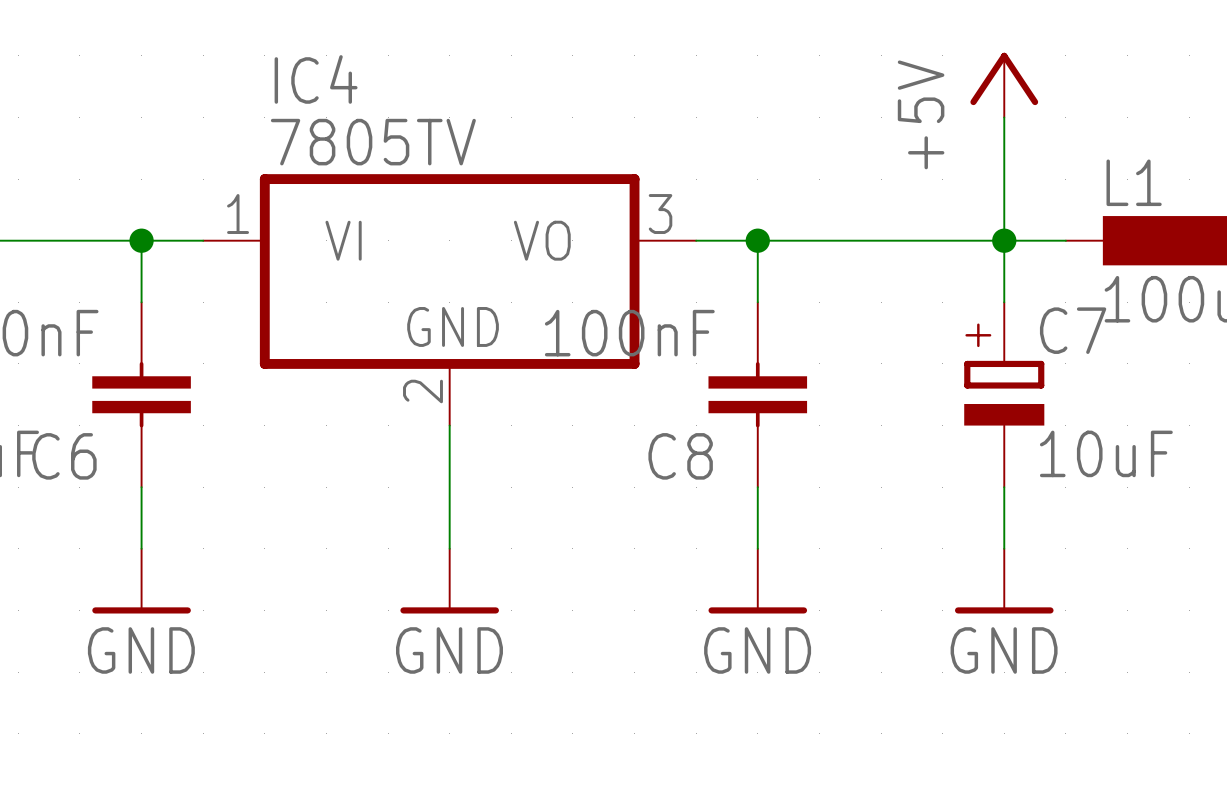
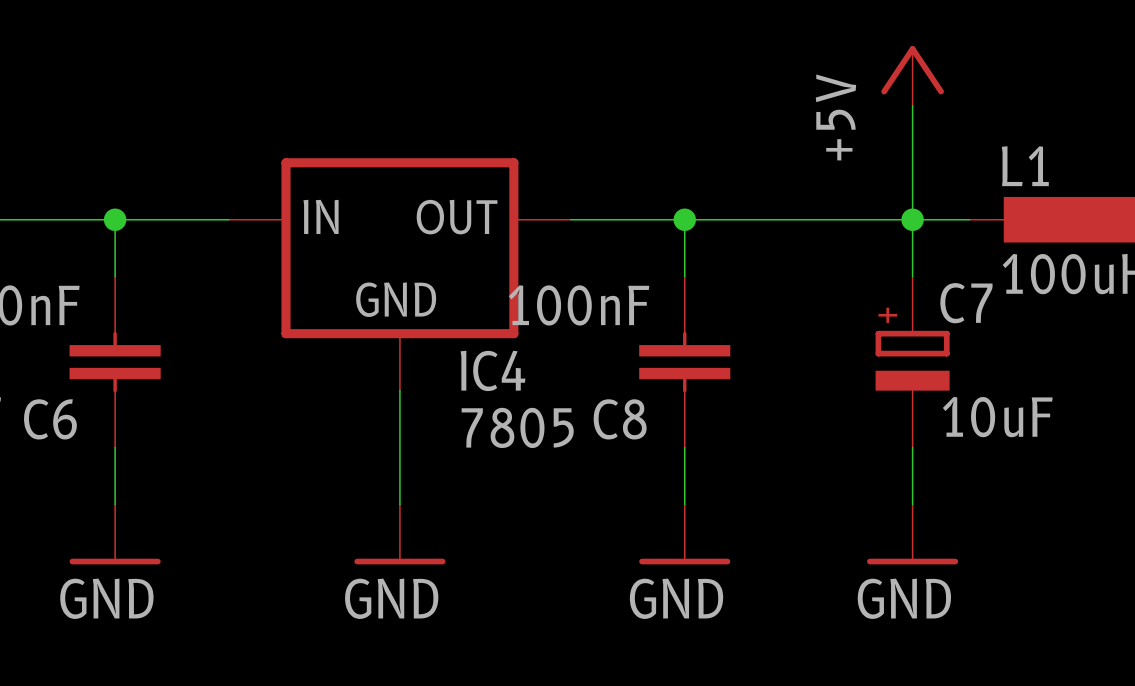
IC4 name position: IC4 (316, 79) -> IC4 (493, 370)
IC4 value: 7805TV (373, 142) -> 7805 (517, 427)
IC4 symbol: [203, 174, 697, 426] -> [229, 158, 571, 391]

